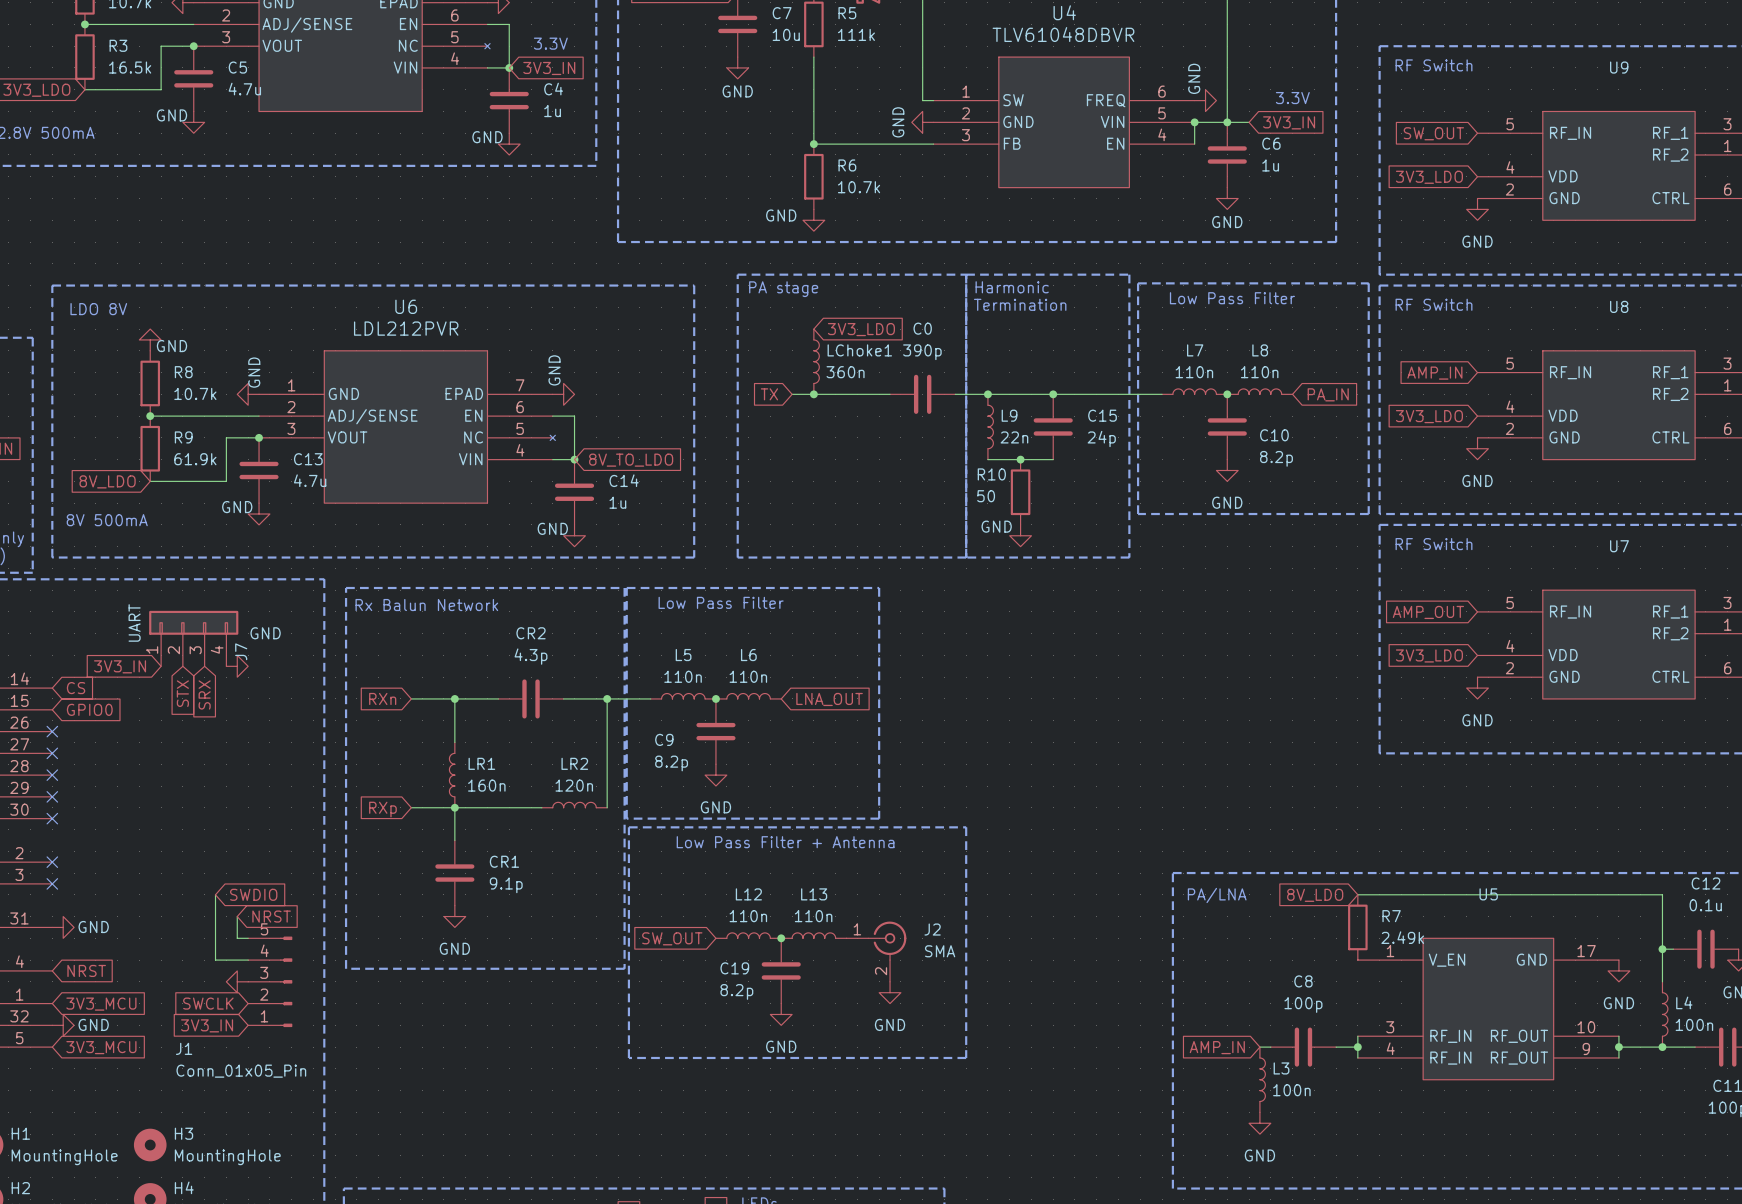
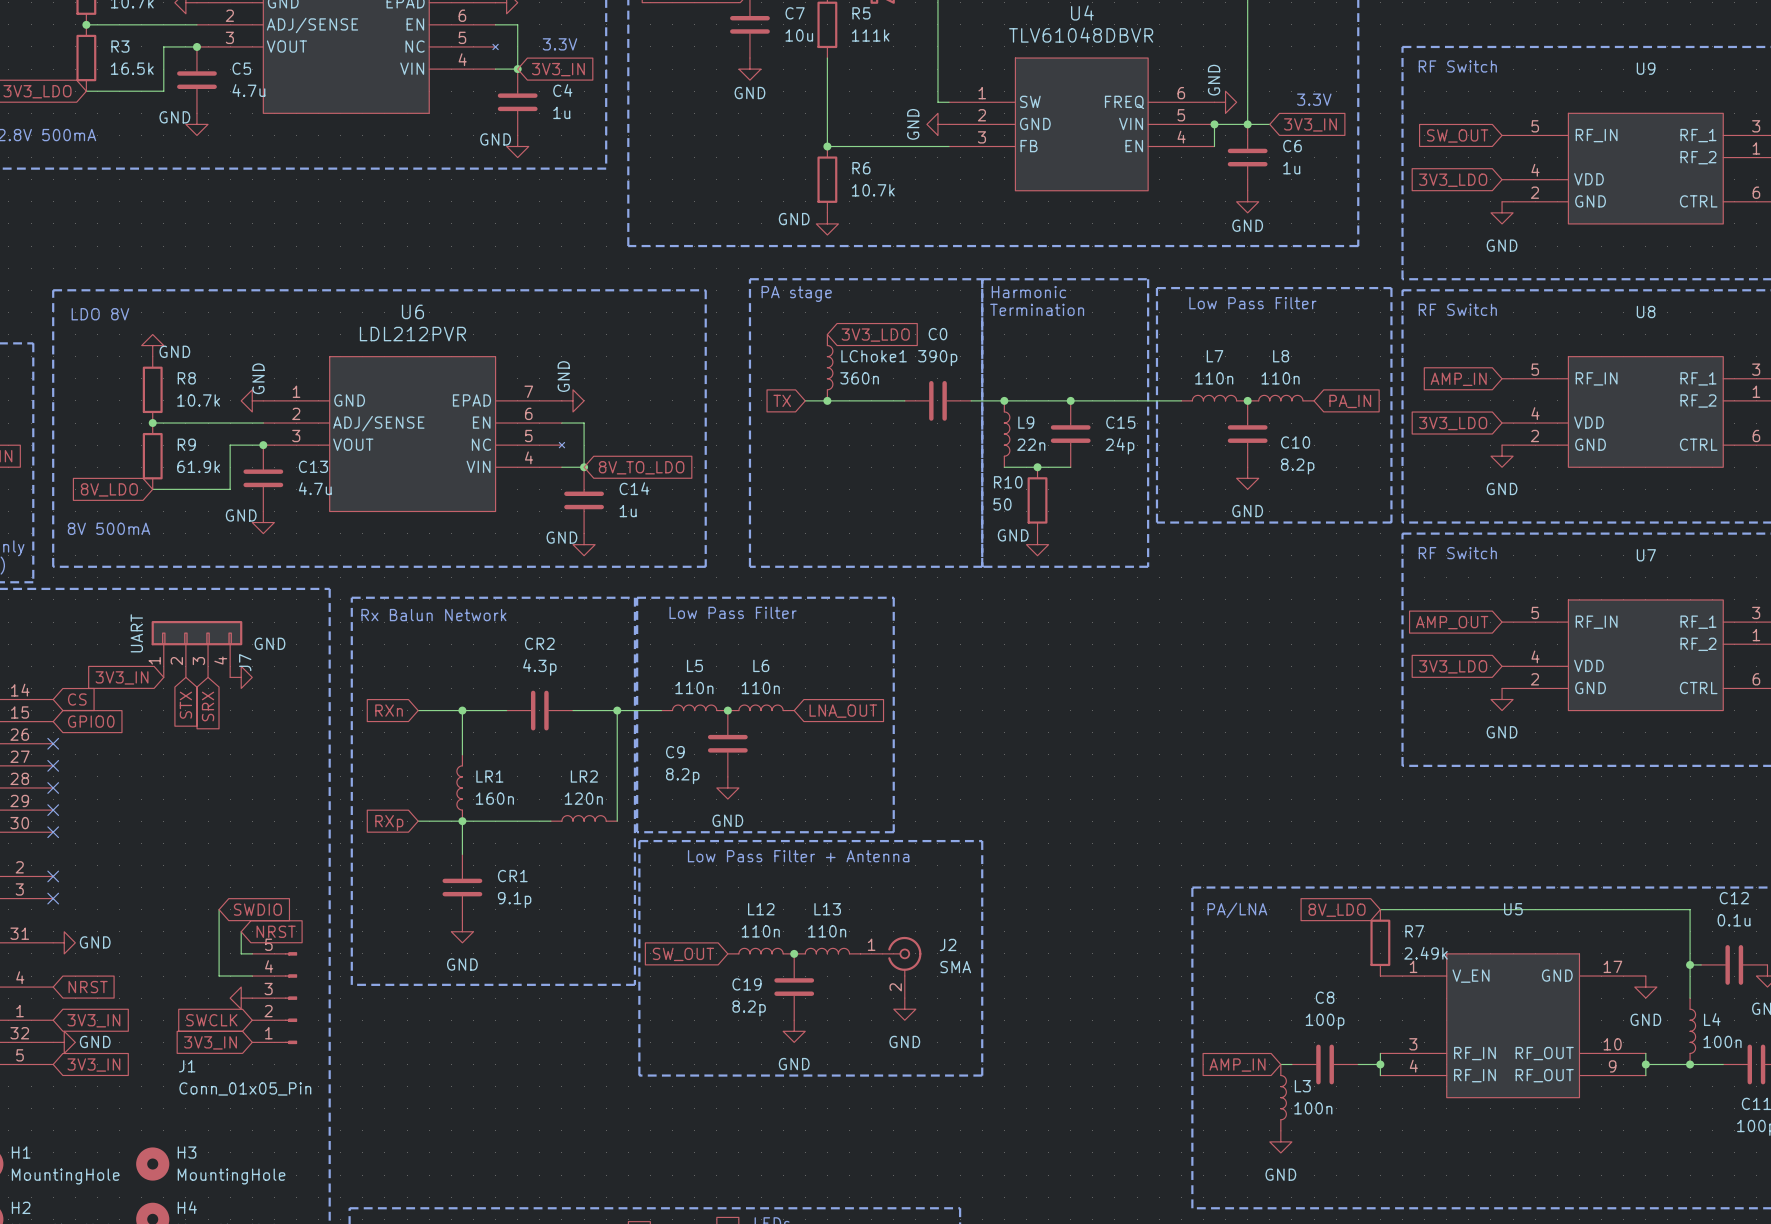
global label: 3V3_MCU (101, 1004) -> 3V3_IN (93, 1020)
global label: 3V3_MCU (101, 1047) -> 3V3_IN (93, 1065)

